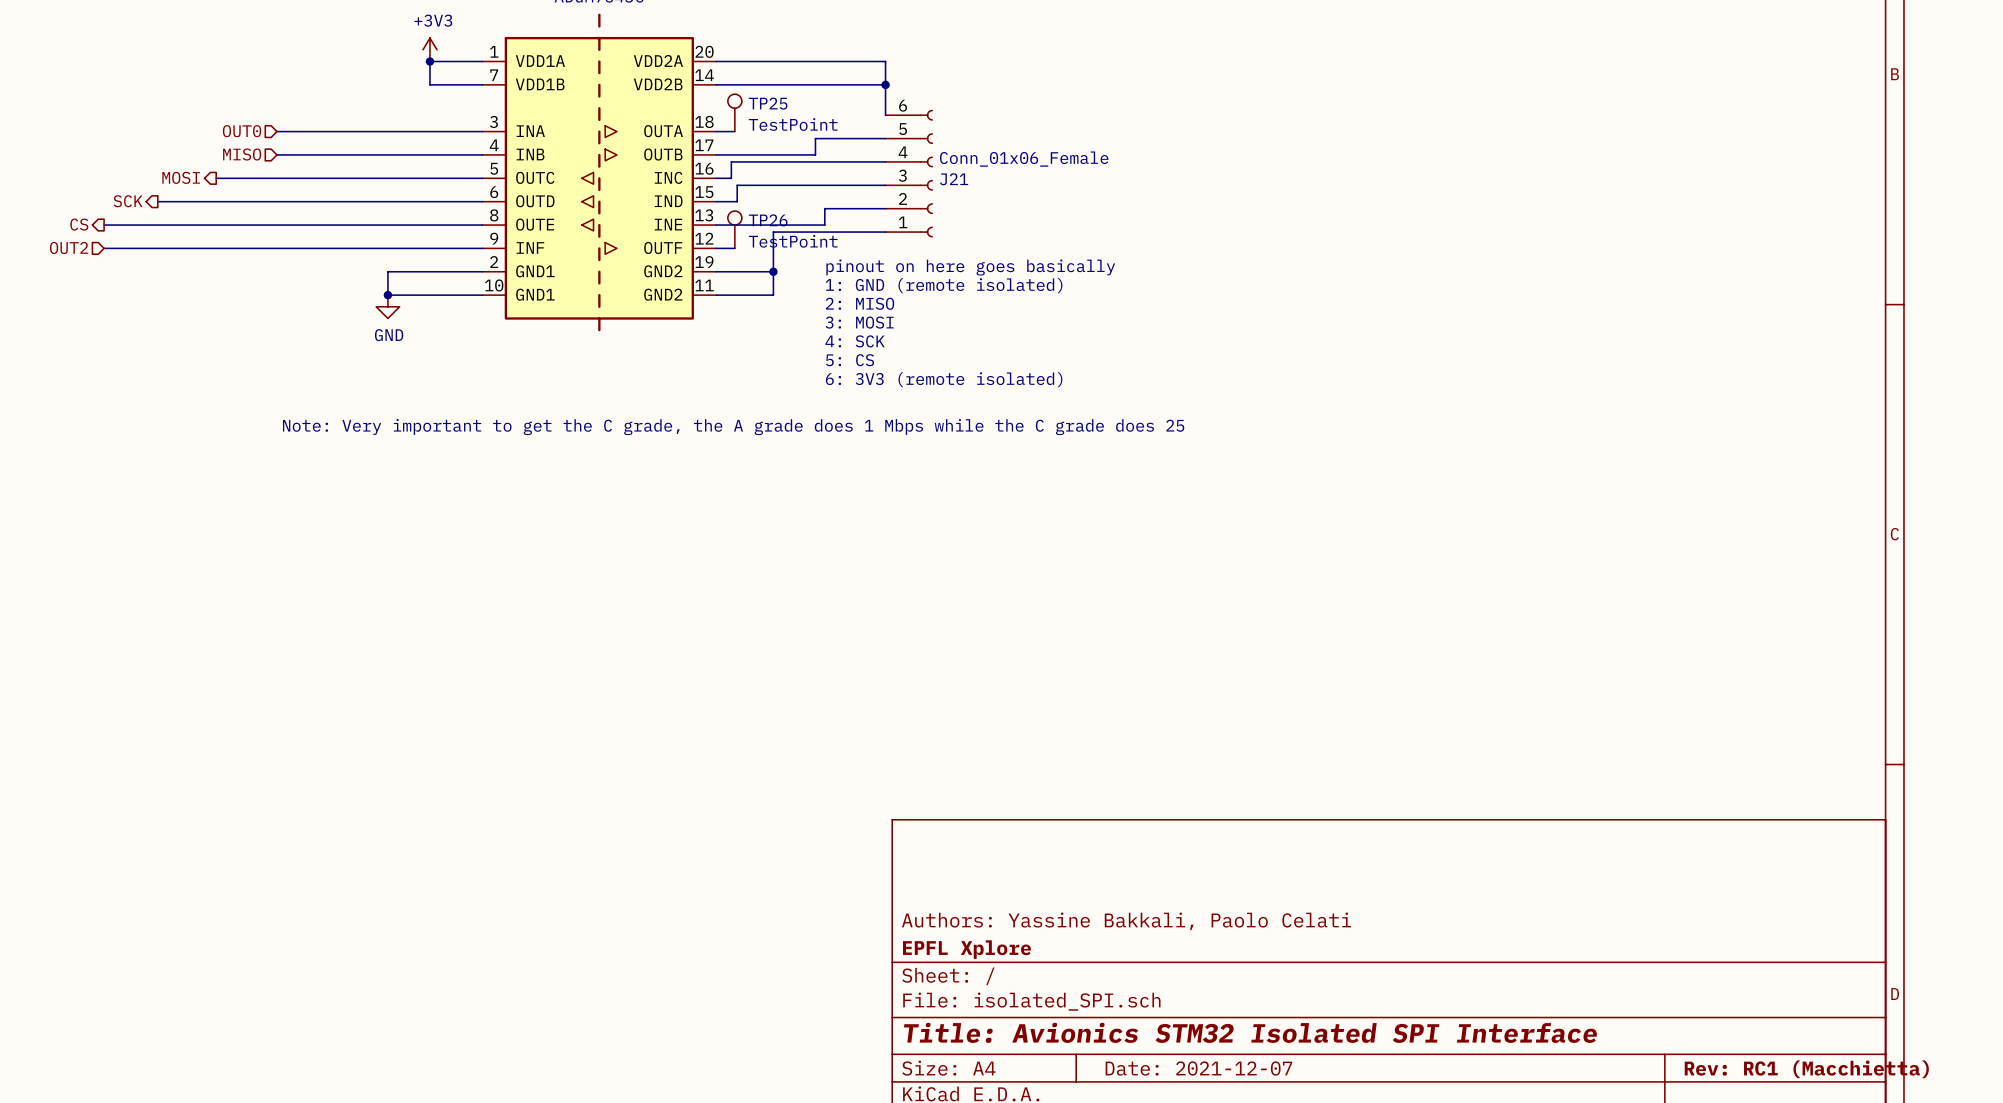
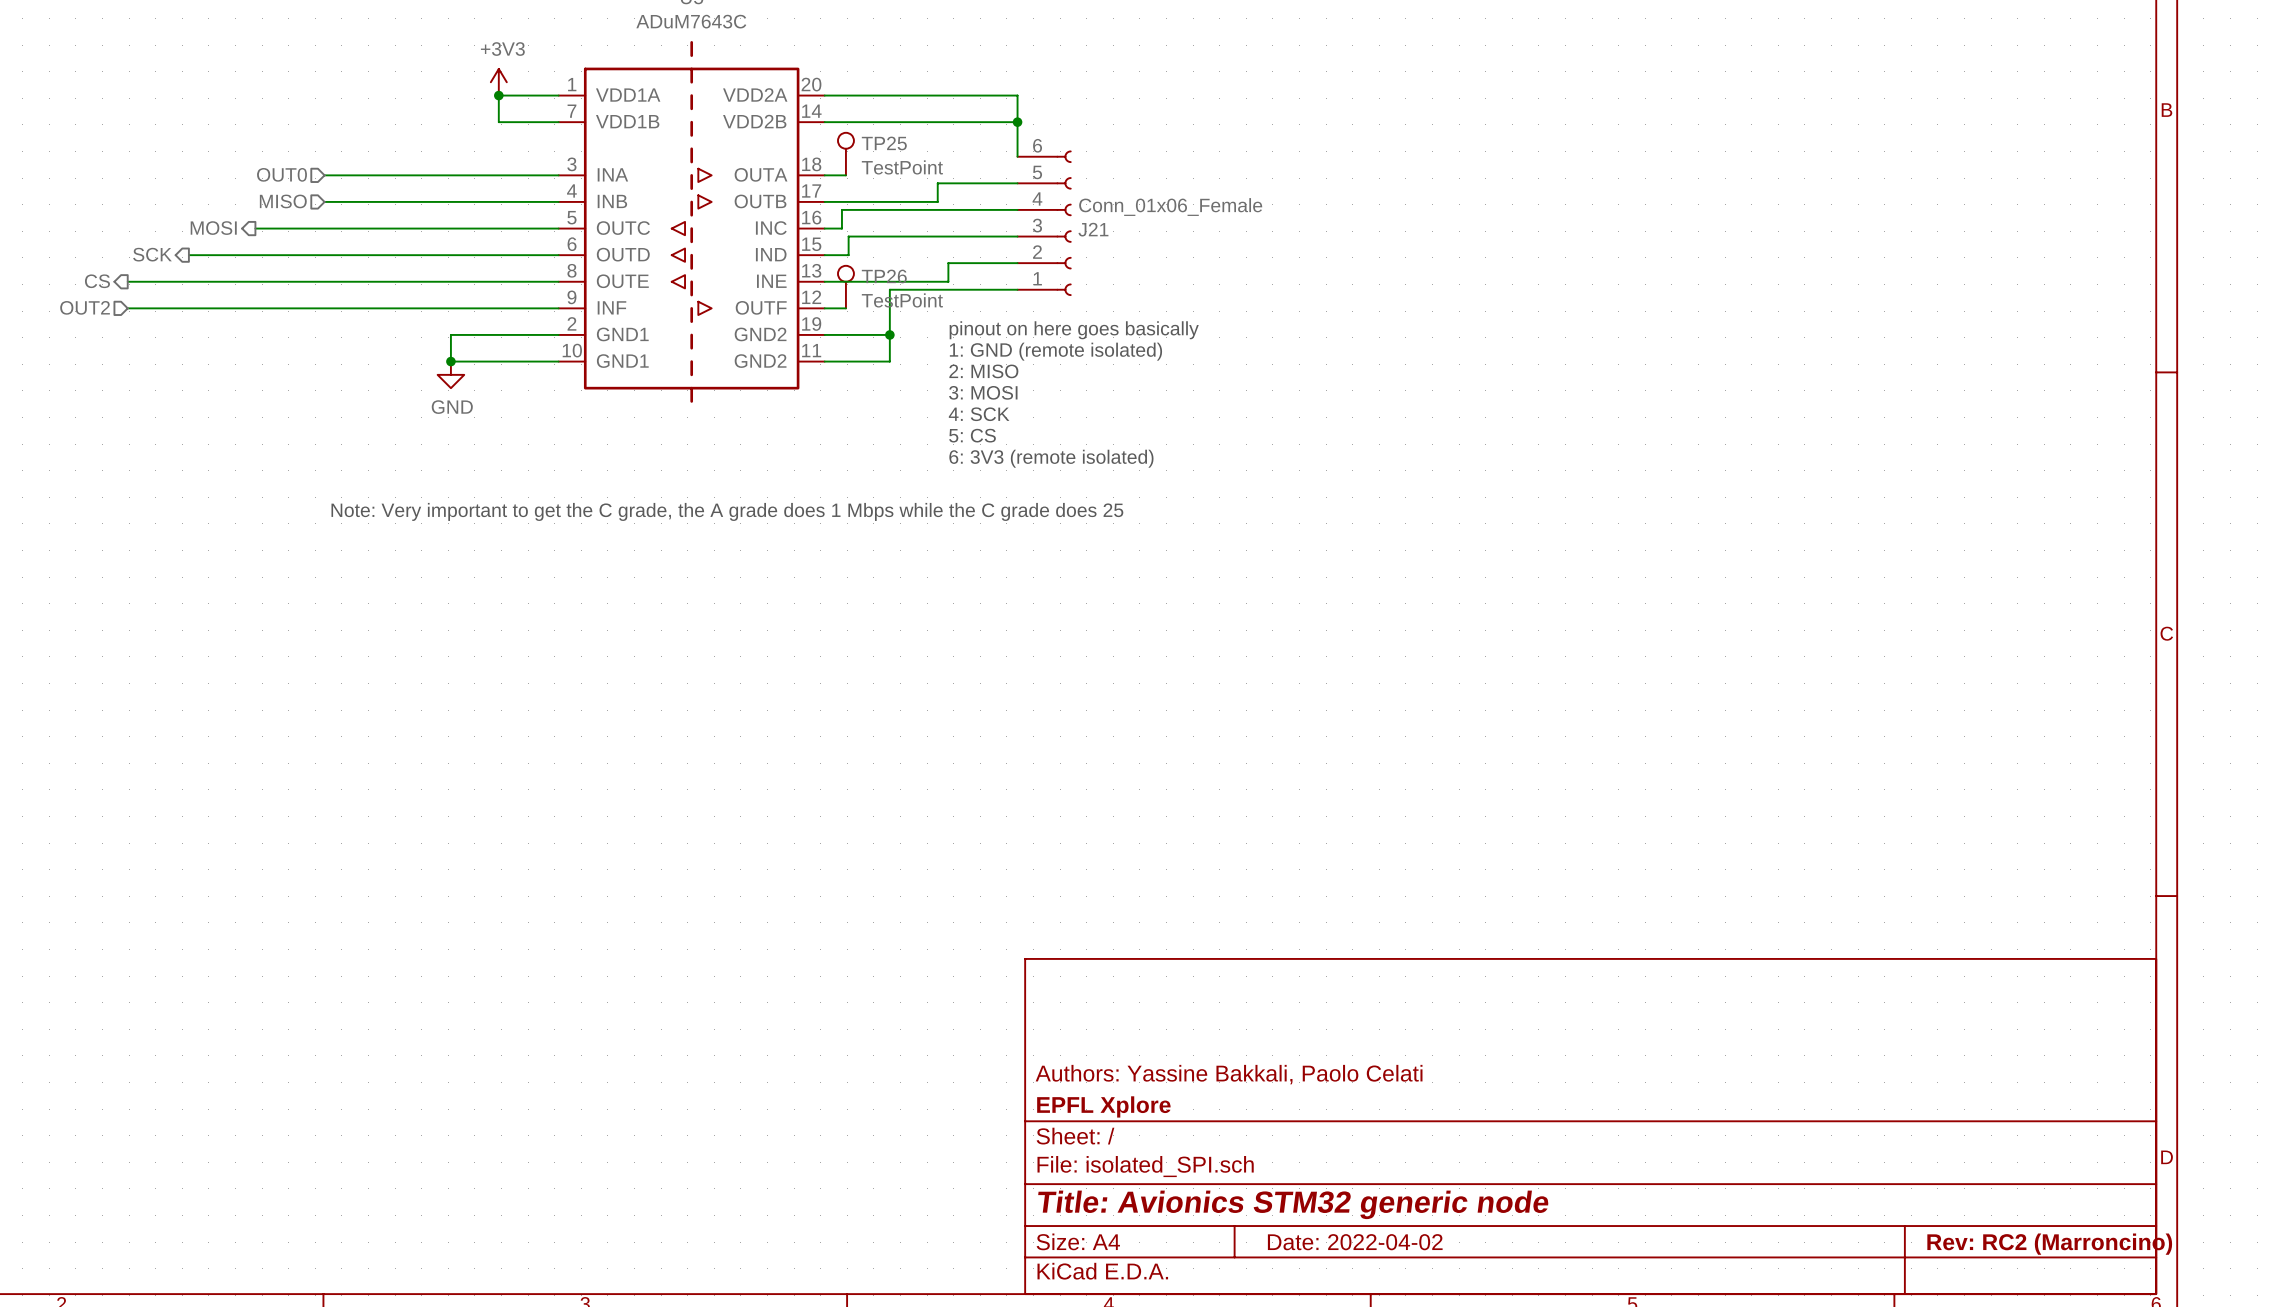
title block: Title: Avionics STM32 Isolated SPI Interface (1250, 1032) -> Title: Avionics STM32 generic node (1293, 1204)
title block: Date: 2021-12-07 (1198, 1068) -> Date: 2022-04-02 (1355, 1242)
title block: Rev: RC1 (Macchietta) (1806, 1069) -> Rev: RC2 (Marroncino) (2049, 1244)

